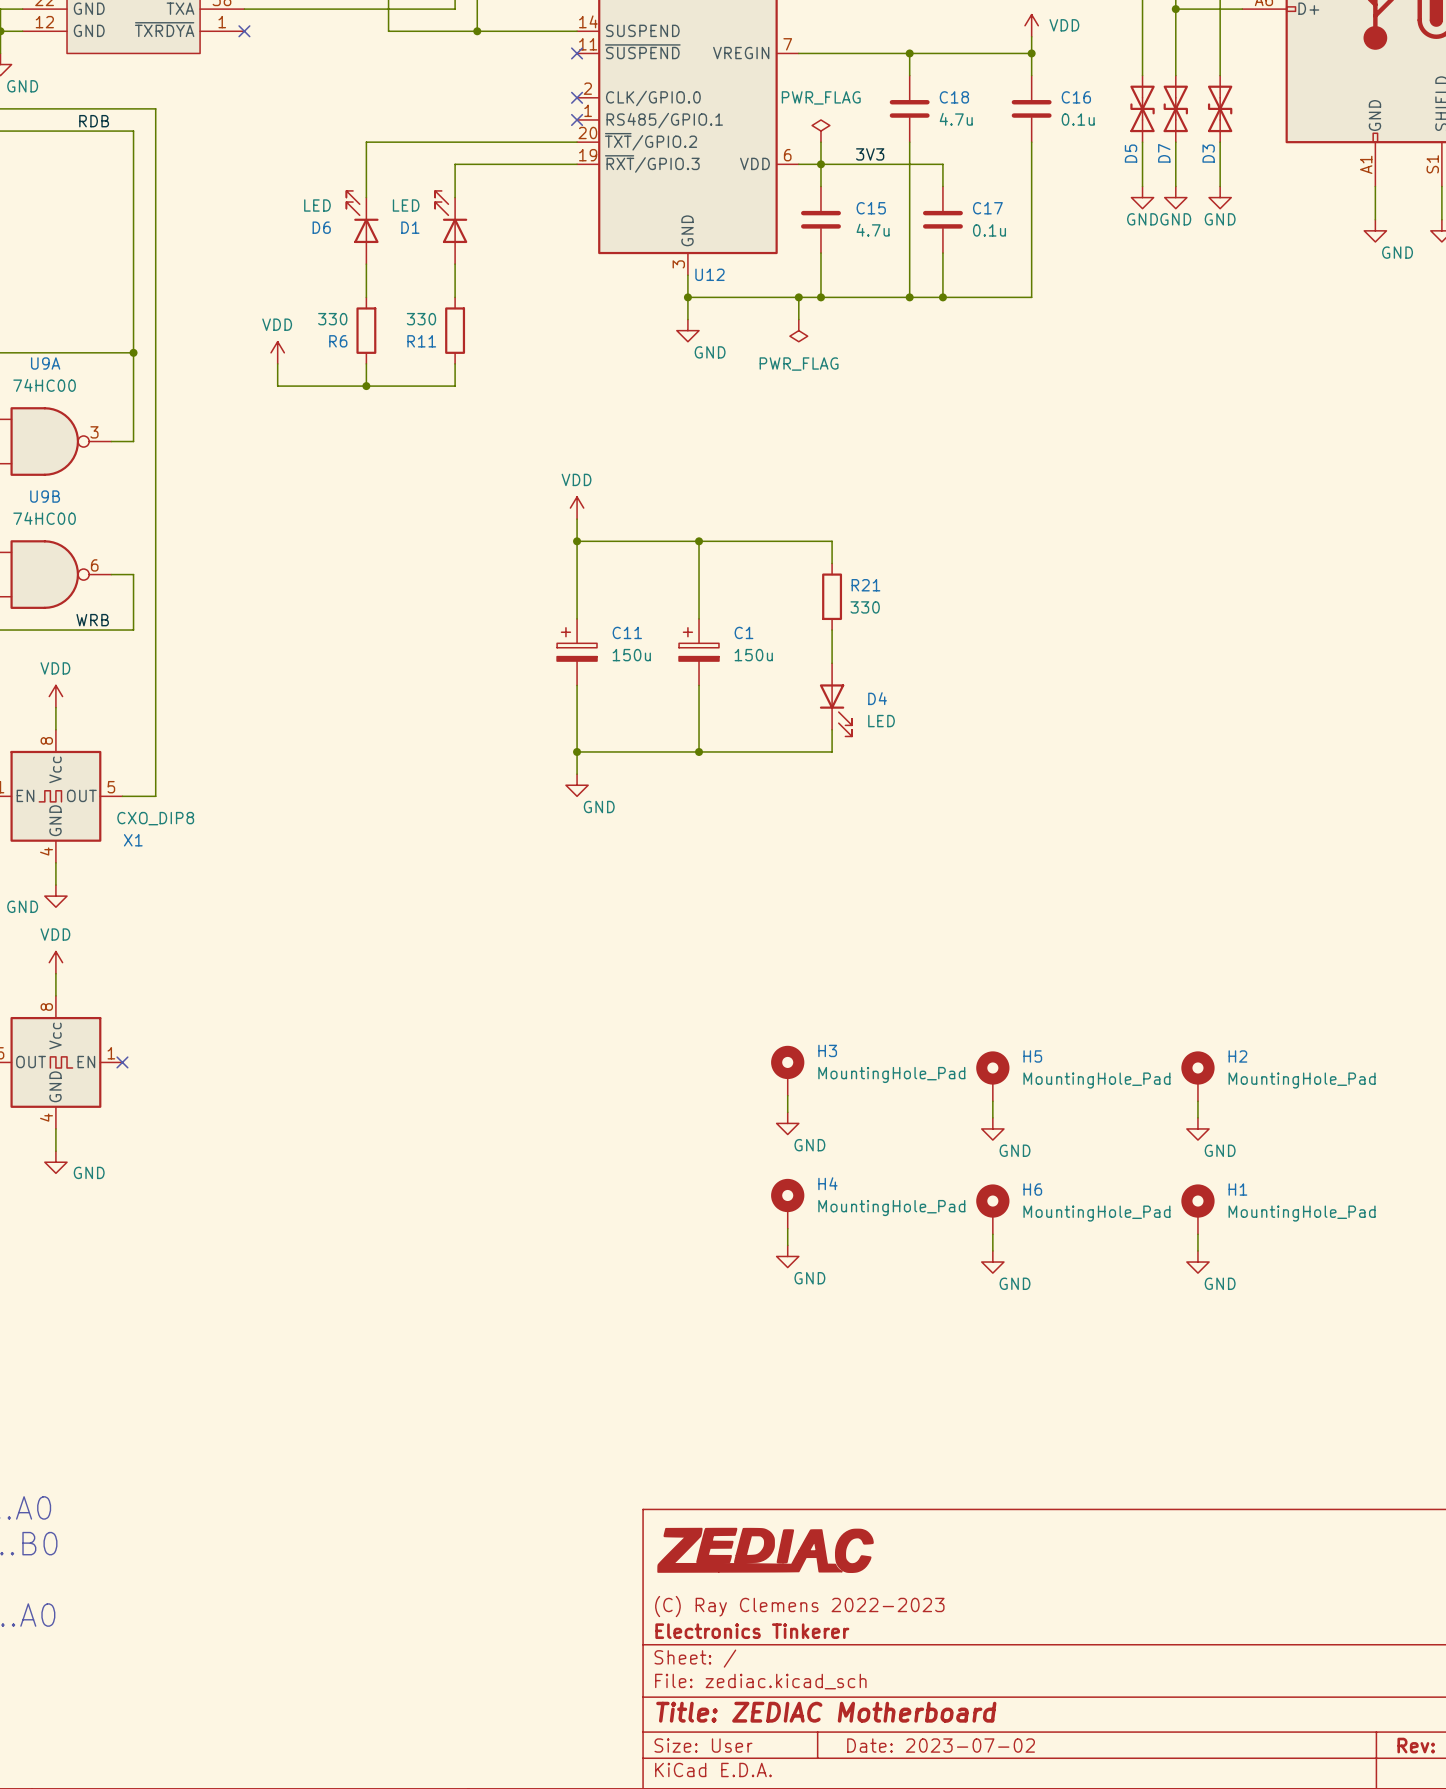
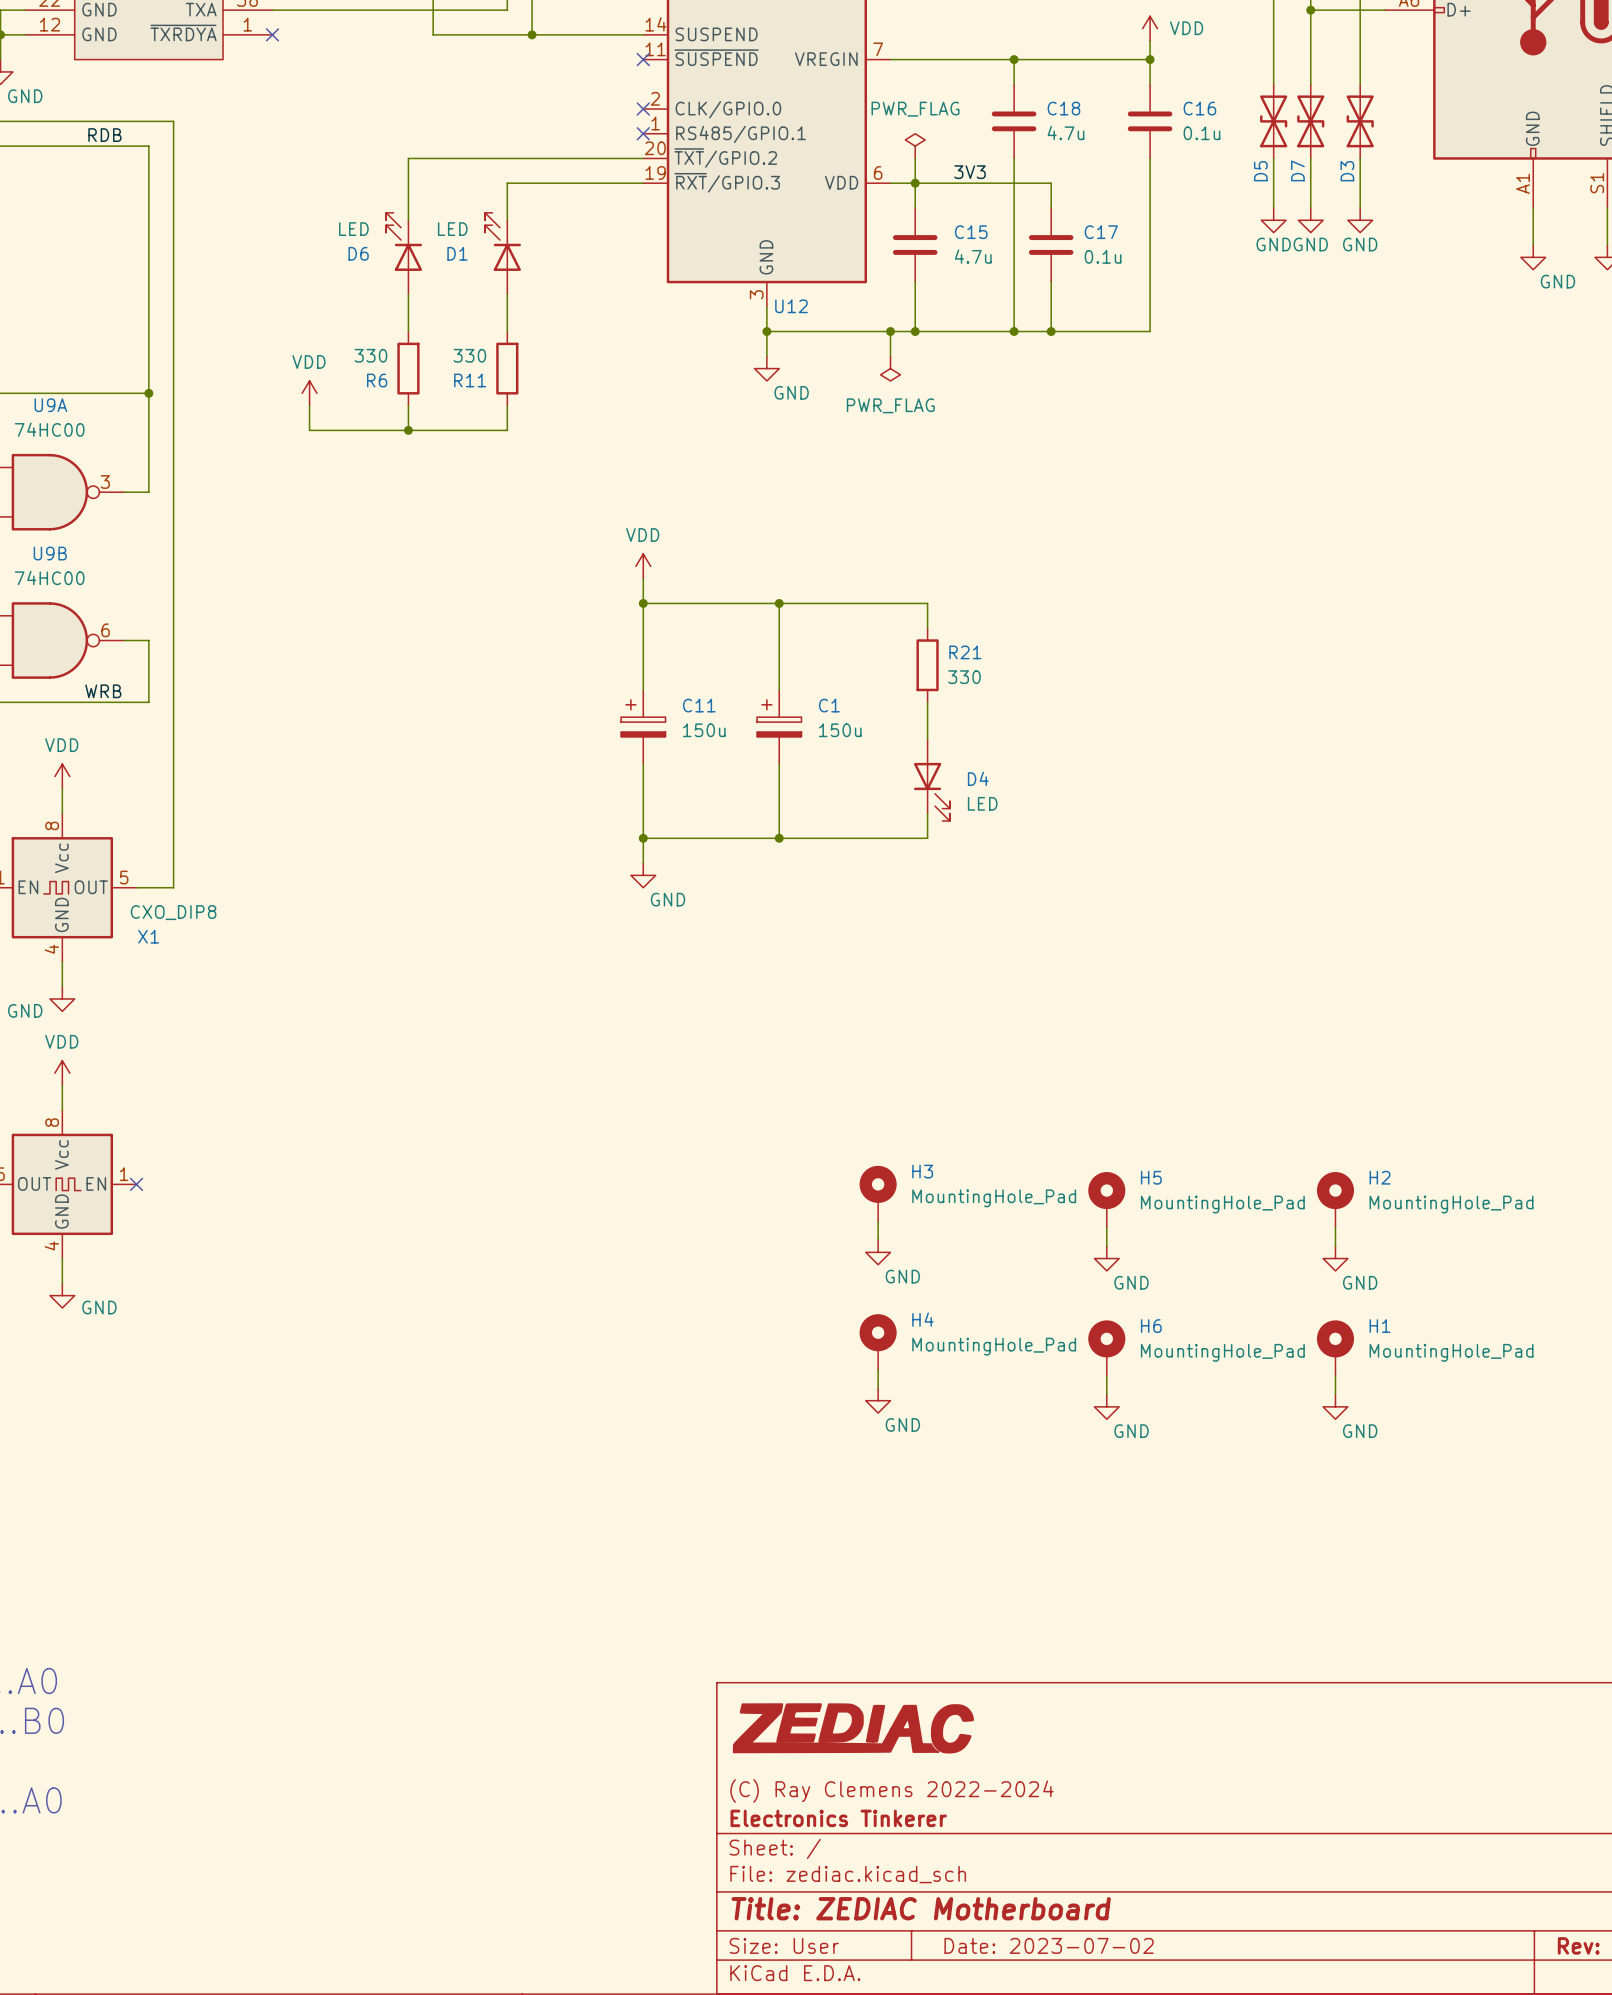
title block: (C) Ray Clemens 2022-2023 (799, 1606) -> (C) Ray Clemens 2022-2024 (891, 1790)

